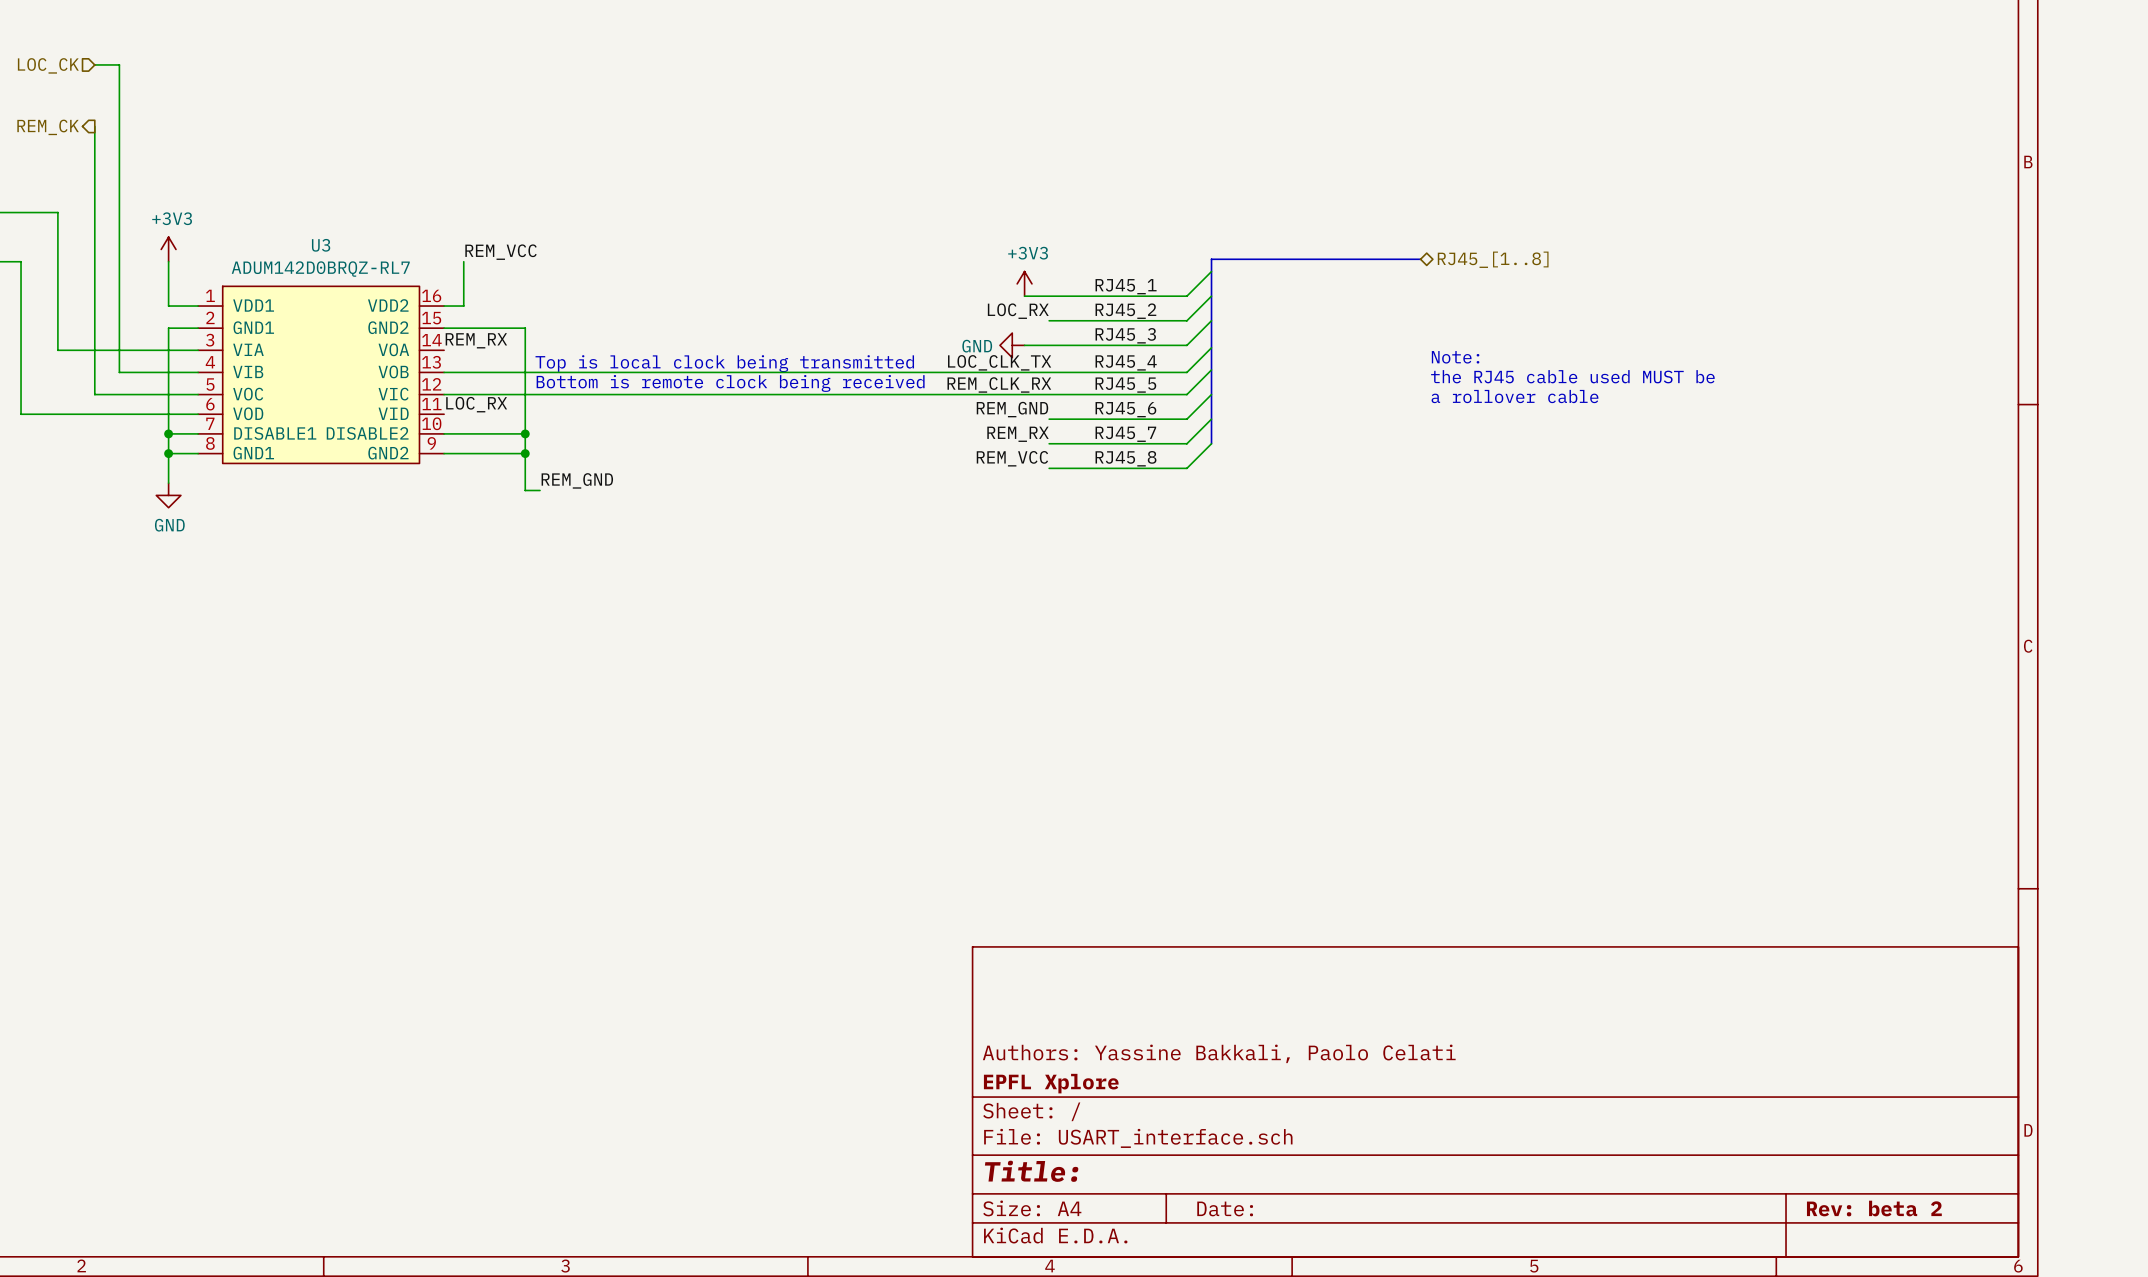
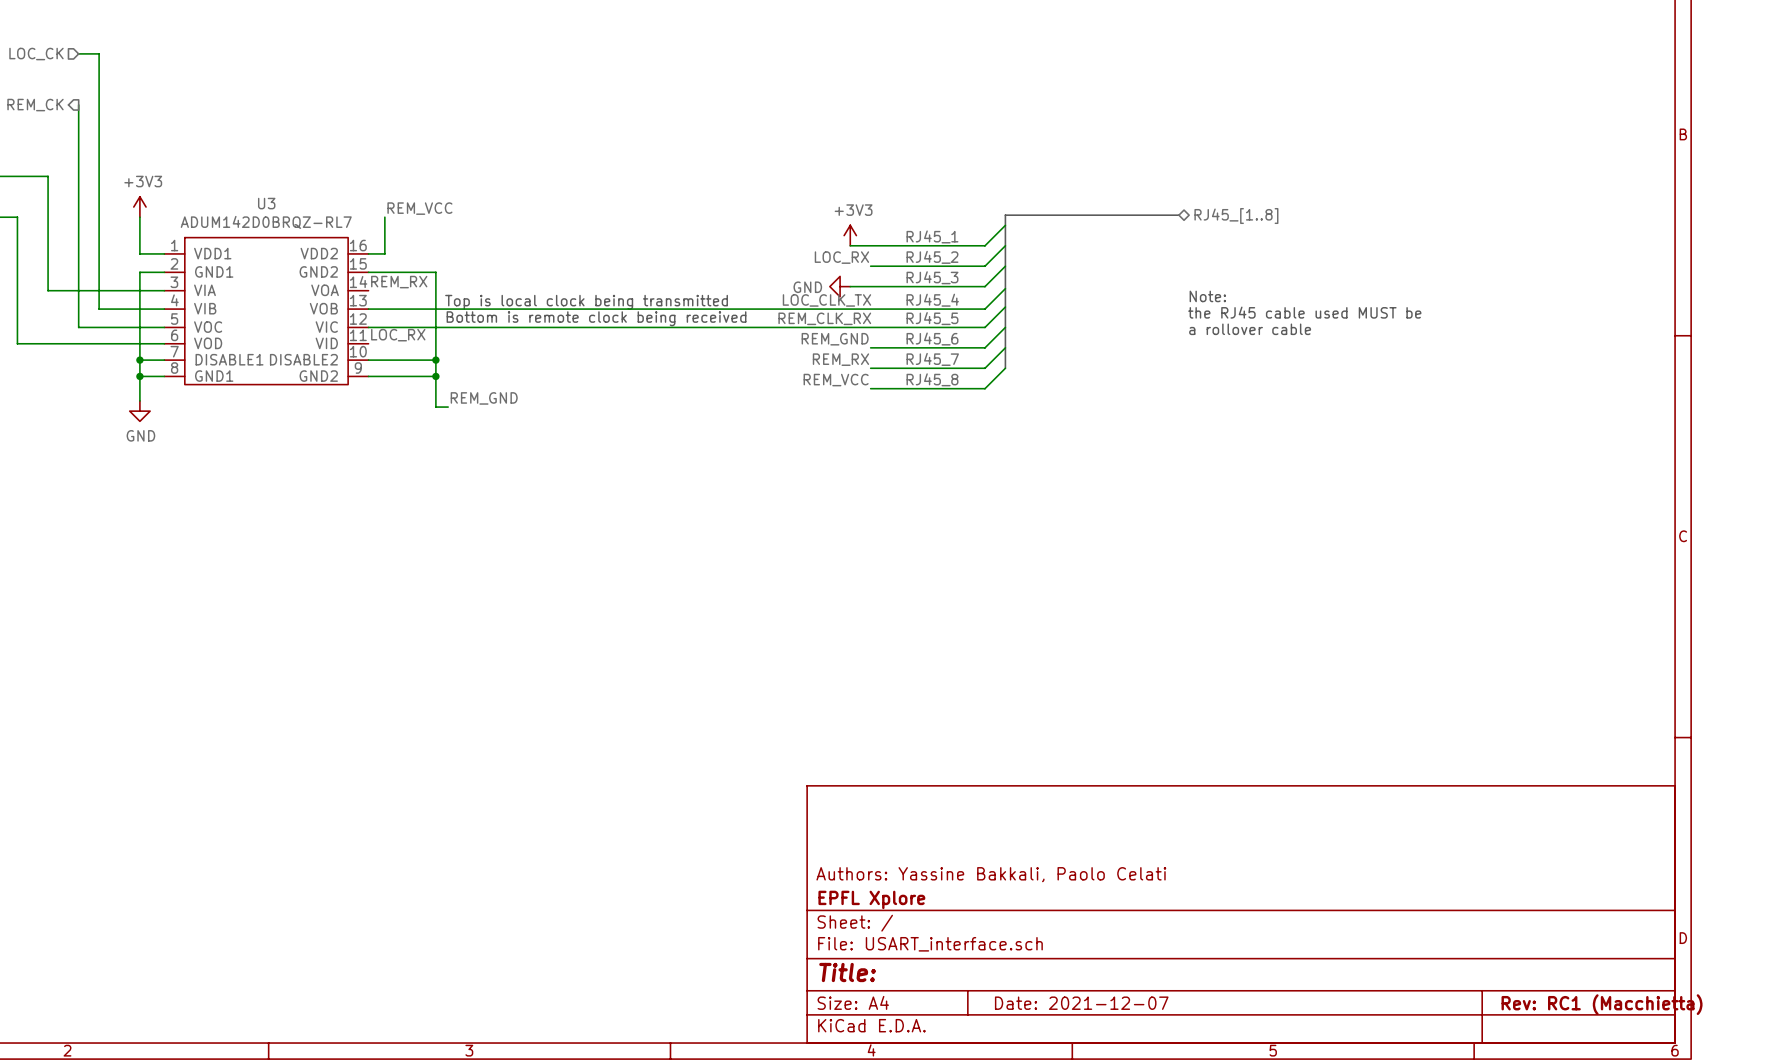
title block: Date: (1225, 1208) -> Date: 2021-12-07 (1081, 1003)
title block: Rev: beta 2 (1874, 1208) -> Rev: RC1 (Macchietta) (1602, 1004)

